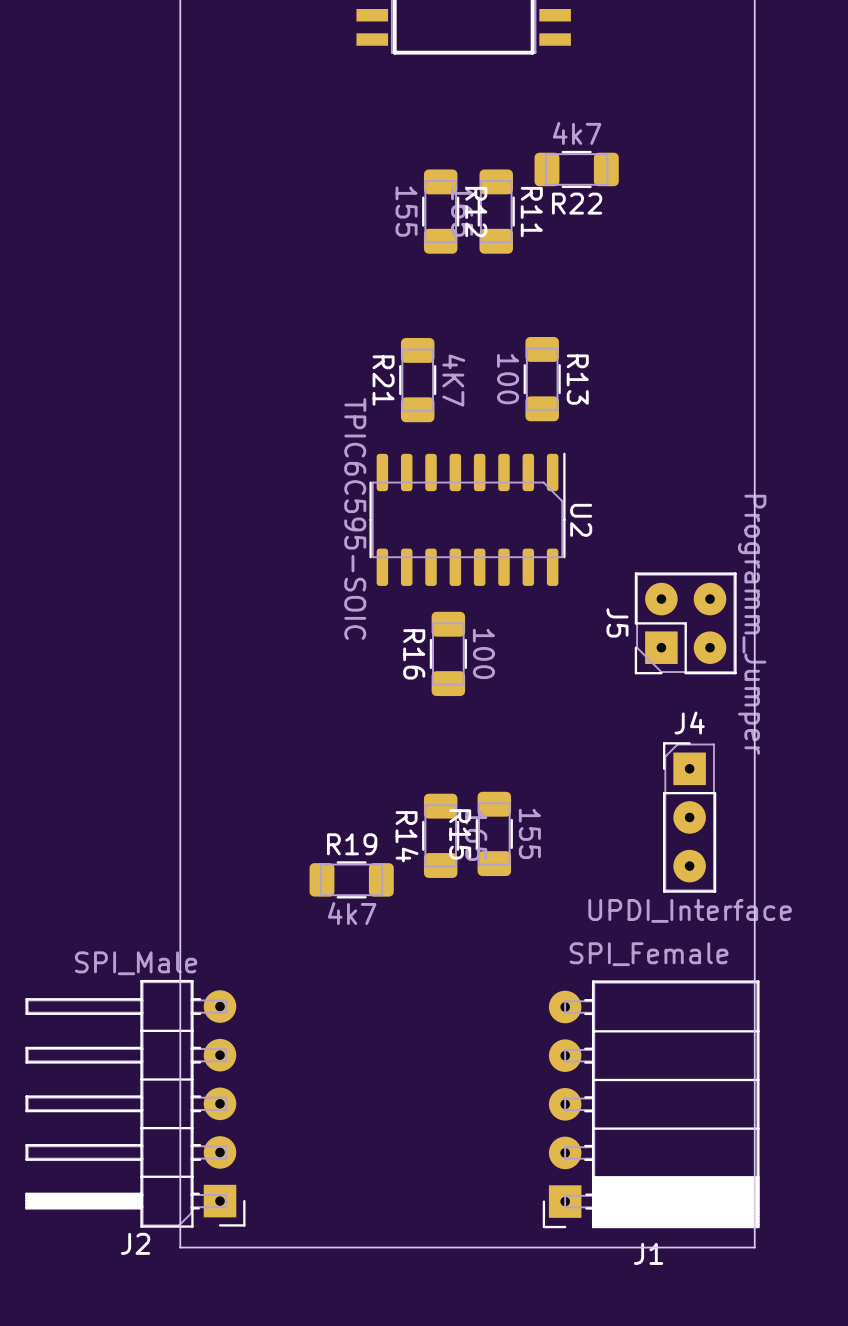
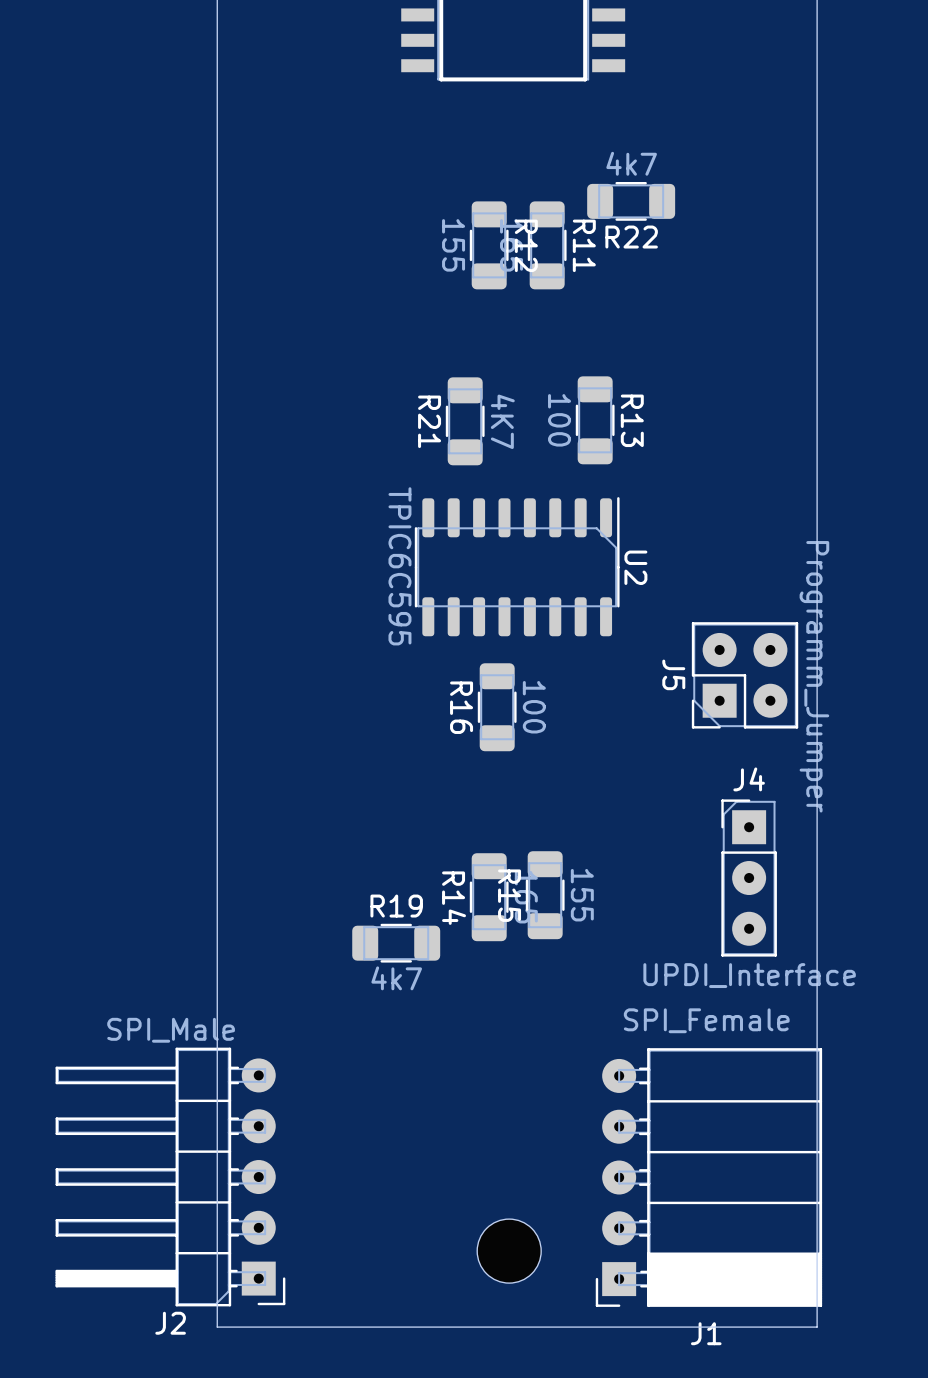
U2 value: TPIC6C595-SOIC (355, 518) -> TPIC6C595 (399, 566)
part: none -> (509, 1251)

